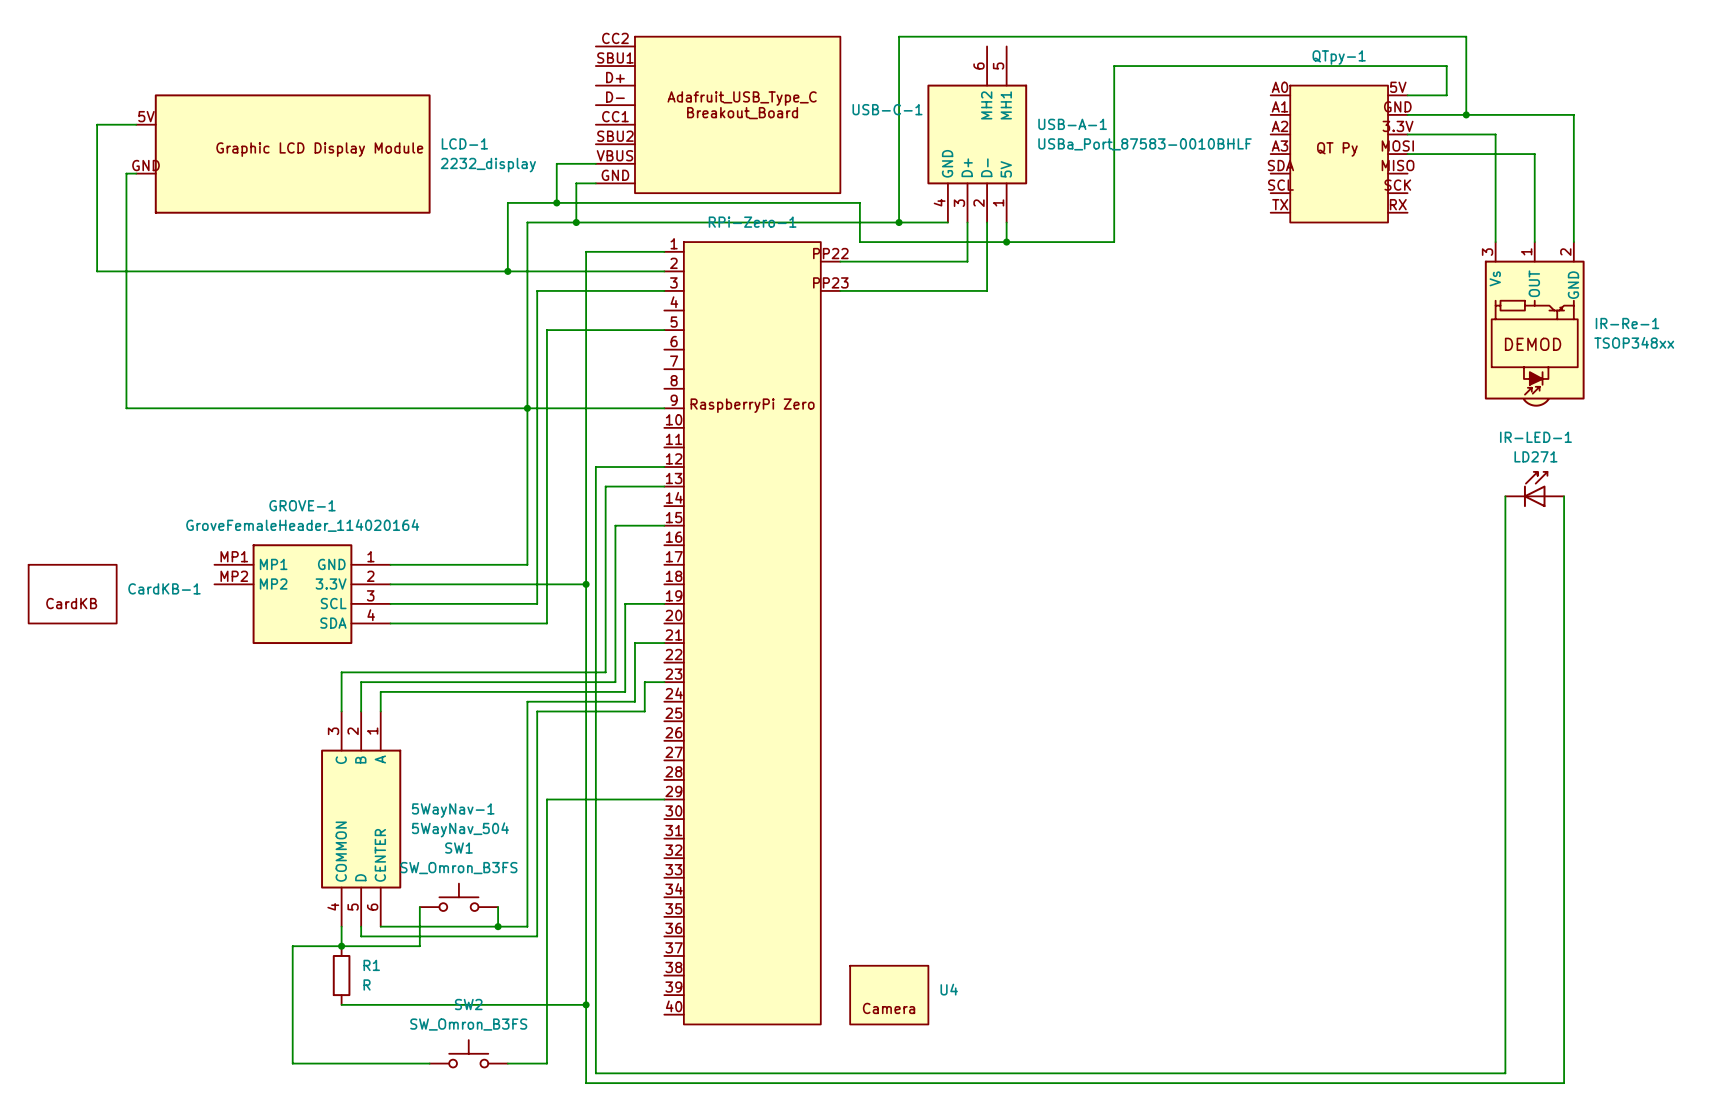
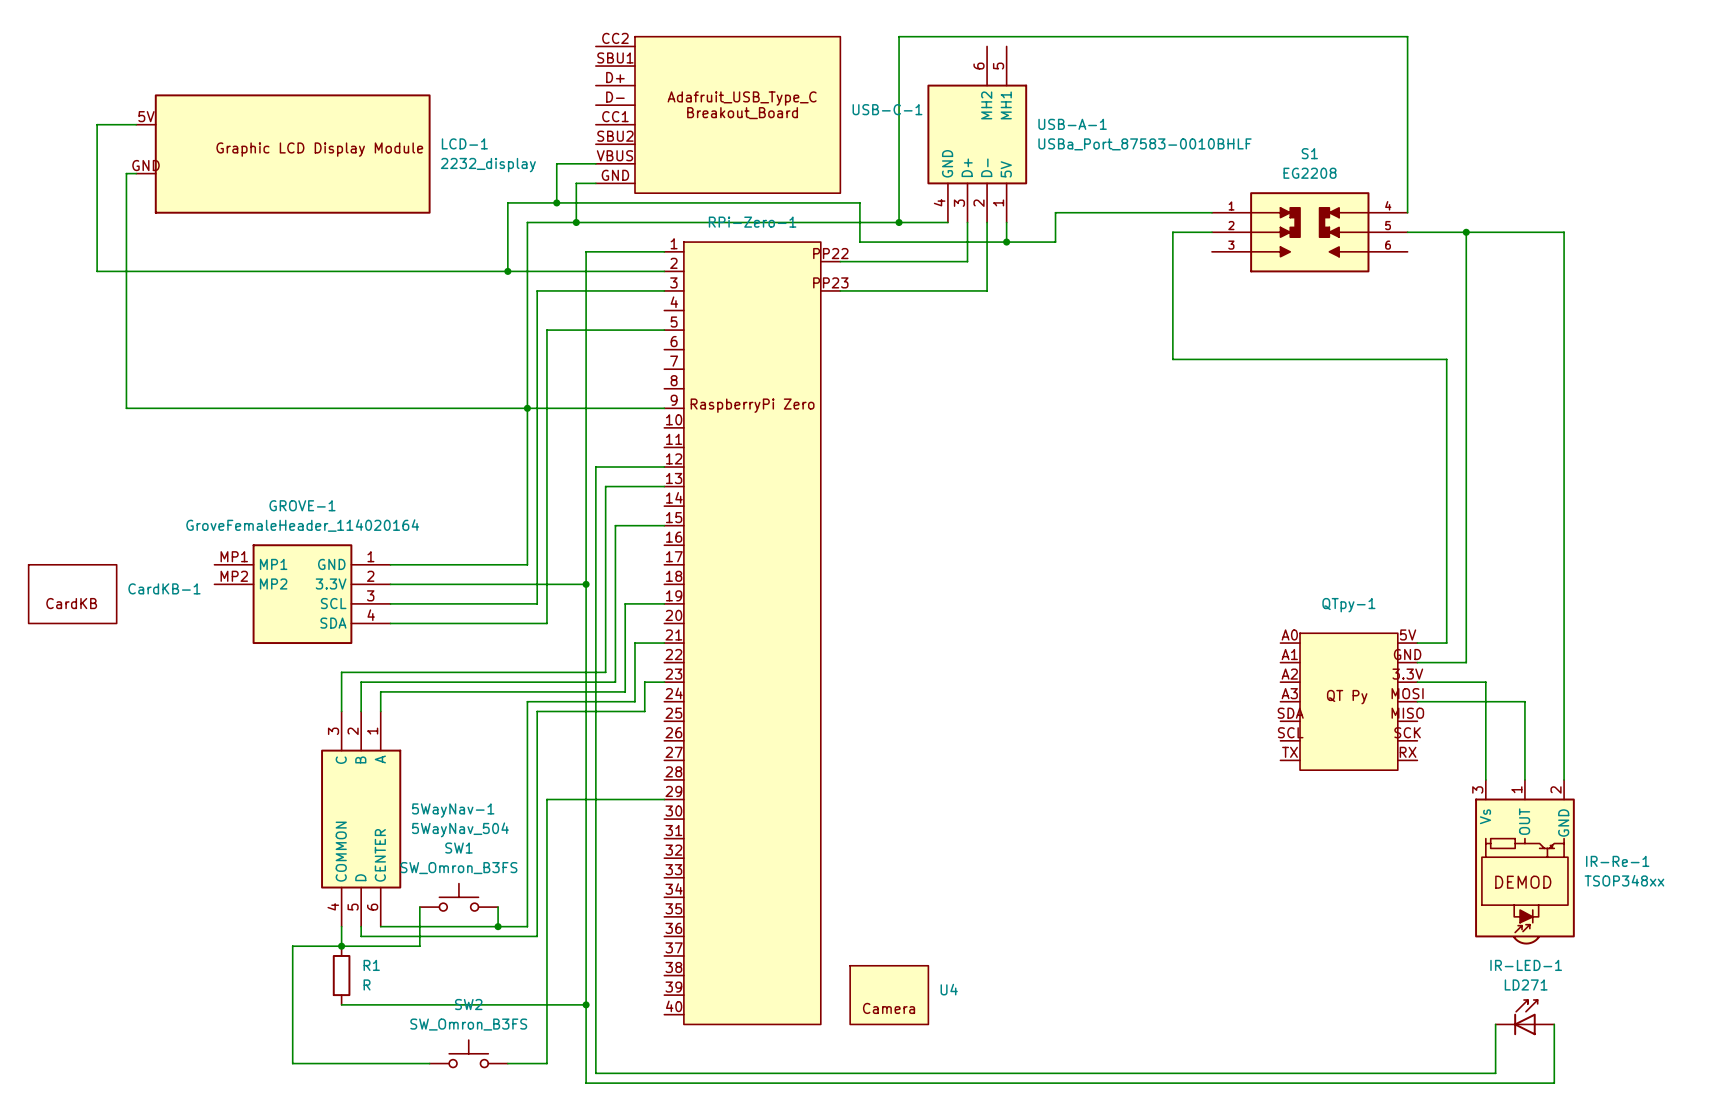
wire: (1407, 36) (1466, 36) (1466, 114) -> (1407, 36) (1407, 212)
wire: (1407, 95) (1446, 95) (1446, 66) (1114, 66) (1114, 242) (1055, 242) -> (1212, 212) (1055, 212) (1055, 242)
wire: (1407, 114) (1573, 114) (1573, 242) -> none
junction: (1466, 114) -> none
wire: (1407, 134) (1495, 134) (1495, 242) -> none
QTpy-1 position: (1339, 154) -> (1348, 701)
wire: (1407, 154) (1534, 154) (1534, 242) -> none
wire: none -> (1212, 232) (1172, 232) (1172, 359) (1446, 359) (1446, 643) (1417, 643)
S1: none -> EG2208 (1309, 232)
wire: none -> (1407, 232) (1564, 232) (1564, 496)
wire: none -> (1466, 232) (1466, 662) (1417, 662)
junction: none -> (1466, 232)
IR-Re-1 position: (1534, 324) -> (1524, 862)
IR-LED-1 position: (1534, 489) -> (1524, 1017)
wire: (1505, 496) (1505, 1073) (1495, 1073) -> (1495, 1024) (1495, 1073)
wire: none -> (1417, 682) (1485, 682) (1485, 779)
wire: none -> (1417, 701) (1524, 701) (1524, 779)
wire: (1564, 779) (1564, 1083) (1554, 1083) -> (1554, 1024) (1554, 1083)

